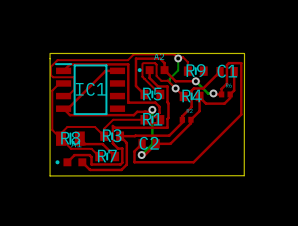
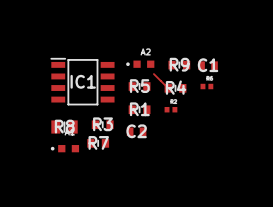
board edge: (50, 53) (50, 175) (244, 175) (244, 53) -> none
board edge: (50, 53) (244, 53) -> none
board edge: (50, 58) (50, 58) -> none
bottom track: (178, 58) (178, 70) (169, 78) (169, 82) (175, 88) -> none
via: (178, 58) -> none
top track: (142, 63) (142, 76) (160, 94) -> none
top track: (143, 63) (155, 63) (156, 76) (161, 80) (168, 80) -> none
top track: (63, 70) (70, 64) (128, 64) (128, 102) (155, 102) (159, 106) (159, 112) (155, 117) (151, 117) (151, 123) (156, 123) (160, 119) -> none
top track: (117, 70) (105, 70) (67, 108) (63, 108) (70, 115) (133, 115) (137, 111) (150, 111) (152, 109) -> none
top track: (149, 70) (149, 78) (158, 86) (167, 86) (167, 127) (114, 127) (112, 125) (112, 143) -> none
top track: (187, 71) (187, 62) (182, 56) (178, 58) (174, 54) (133, 54) (128, 60) (57, 60) (51, 66) (51, 75) (53, 77) (74, 77) (74, 89) (67, 96) (63, 96) -> none
top track: (220, 71) (203, 88) (193, 88) (191, 90) (191, 106) (182, 116) (182, 122) (169, 135) (120, 136) (126, 142) -> none
top track: (234, 71) (234, 90) (224, 103) (206, 103) (199, 97) -> none
bottom track: (195, 81) (208, 93) (213, 93) -> none
via: (195, 81) -> none
top track: (199, 81) (175, 81) (164, 70) (164, 63) (160, 58) (135, 58) (135, 86) (144, 94) -> none
top track: (63, 83) (59, 83) (52, 90) (52, 129) (71, 148) (91, 148) (99, 156) -> none
via: (175, 88) -> none
top track: (213, 93) (221, 94) (221, 88) (226, 83) (226, 65) (228, 63) (241, 63) (241, 114) (193, 162) (134, 162) (134, 151) (142, 143) -> none
via: (213, 93) -> none
top track: (199, 96) (199, 111) (190, 119) (190, 123) (170, 143) (156, 143) (144, 155) (141, 155) -> none
bottom track: (152, 109) (152, 144) (141, 155) -> none
via: (152, 109) -> none
top track: (144, 119) (113, 119) (104, 128) (104, 136) (95, 126) (67, 126) (60, 133) (60, 138) -> none
top track: (79, 138) (85, 144) (102, 144) (115, 156) -> none
top track: (126, 143) (126, 164) (121, 169) (90, 169) -> none
top track: (113, 144) (118, 148) (122, 148) (122, 162) (120, 164) (91, 164) (91, 157) (89, 155) (74, 155) (67, 162) -> none
via: (141, 155) -> none
top track: (82, 162) (90, 169) -> none

